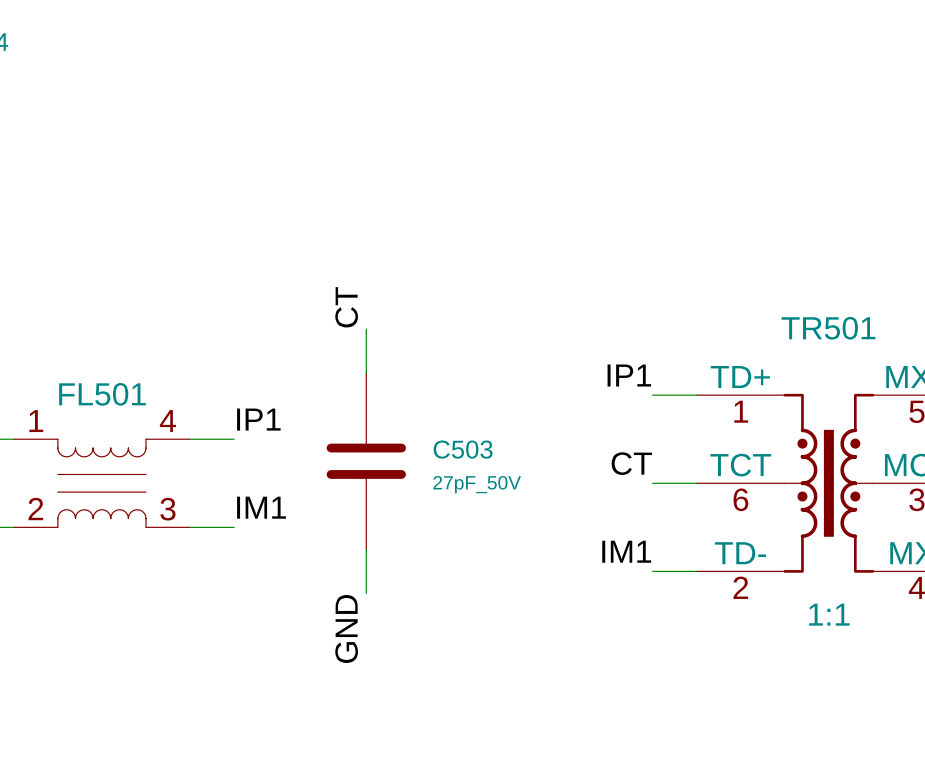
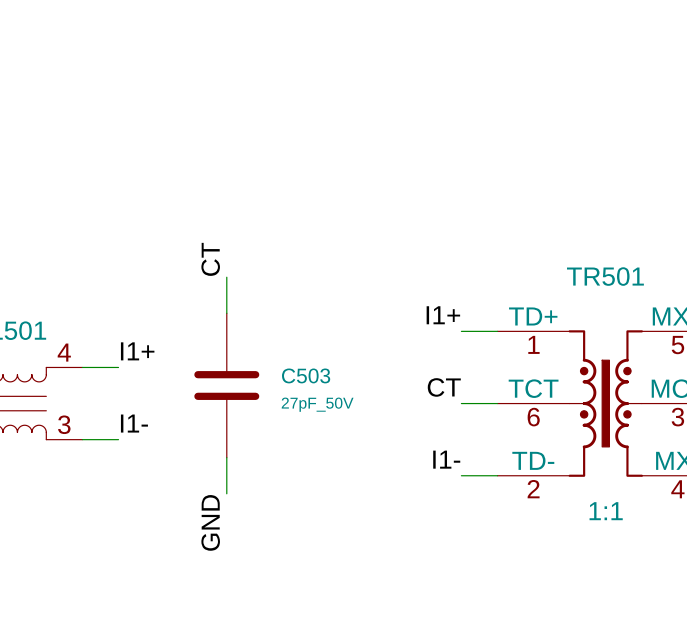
label: IP1 (629, 375) -> I1+ (443, 315)
label: IP1 (258, 419) -> I1+ (137, 351)
label: IM1 (261, 507) -> I1- (134, 423)
label: IM1 (626, 551) -> I1- (446, 459)

